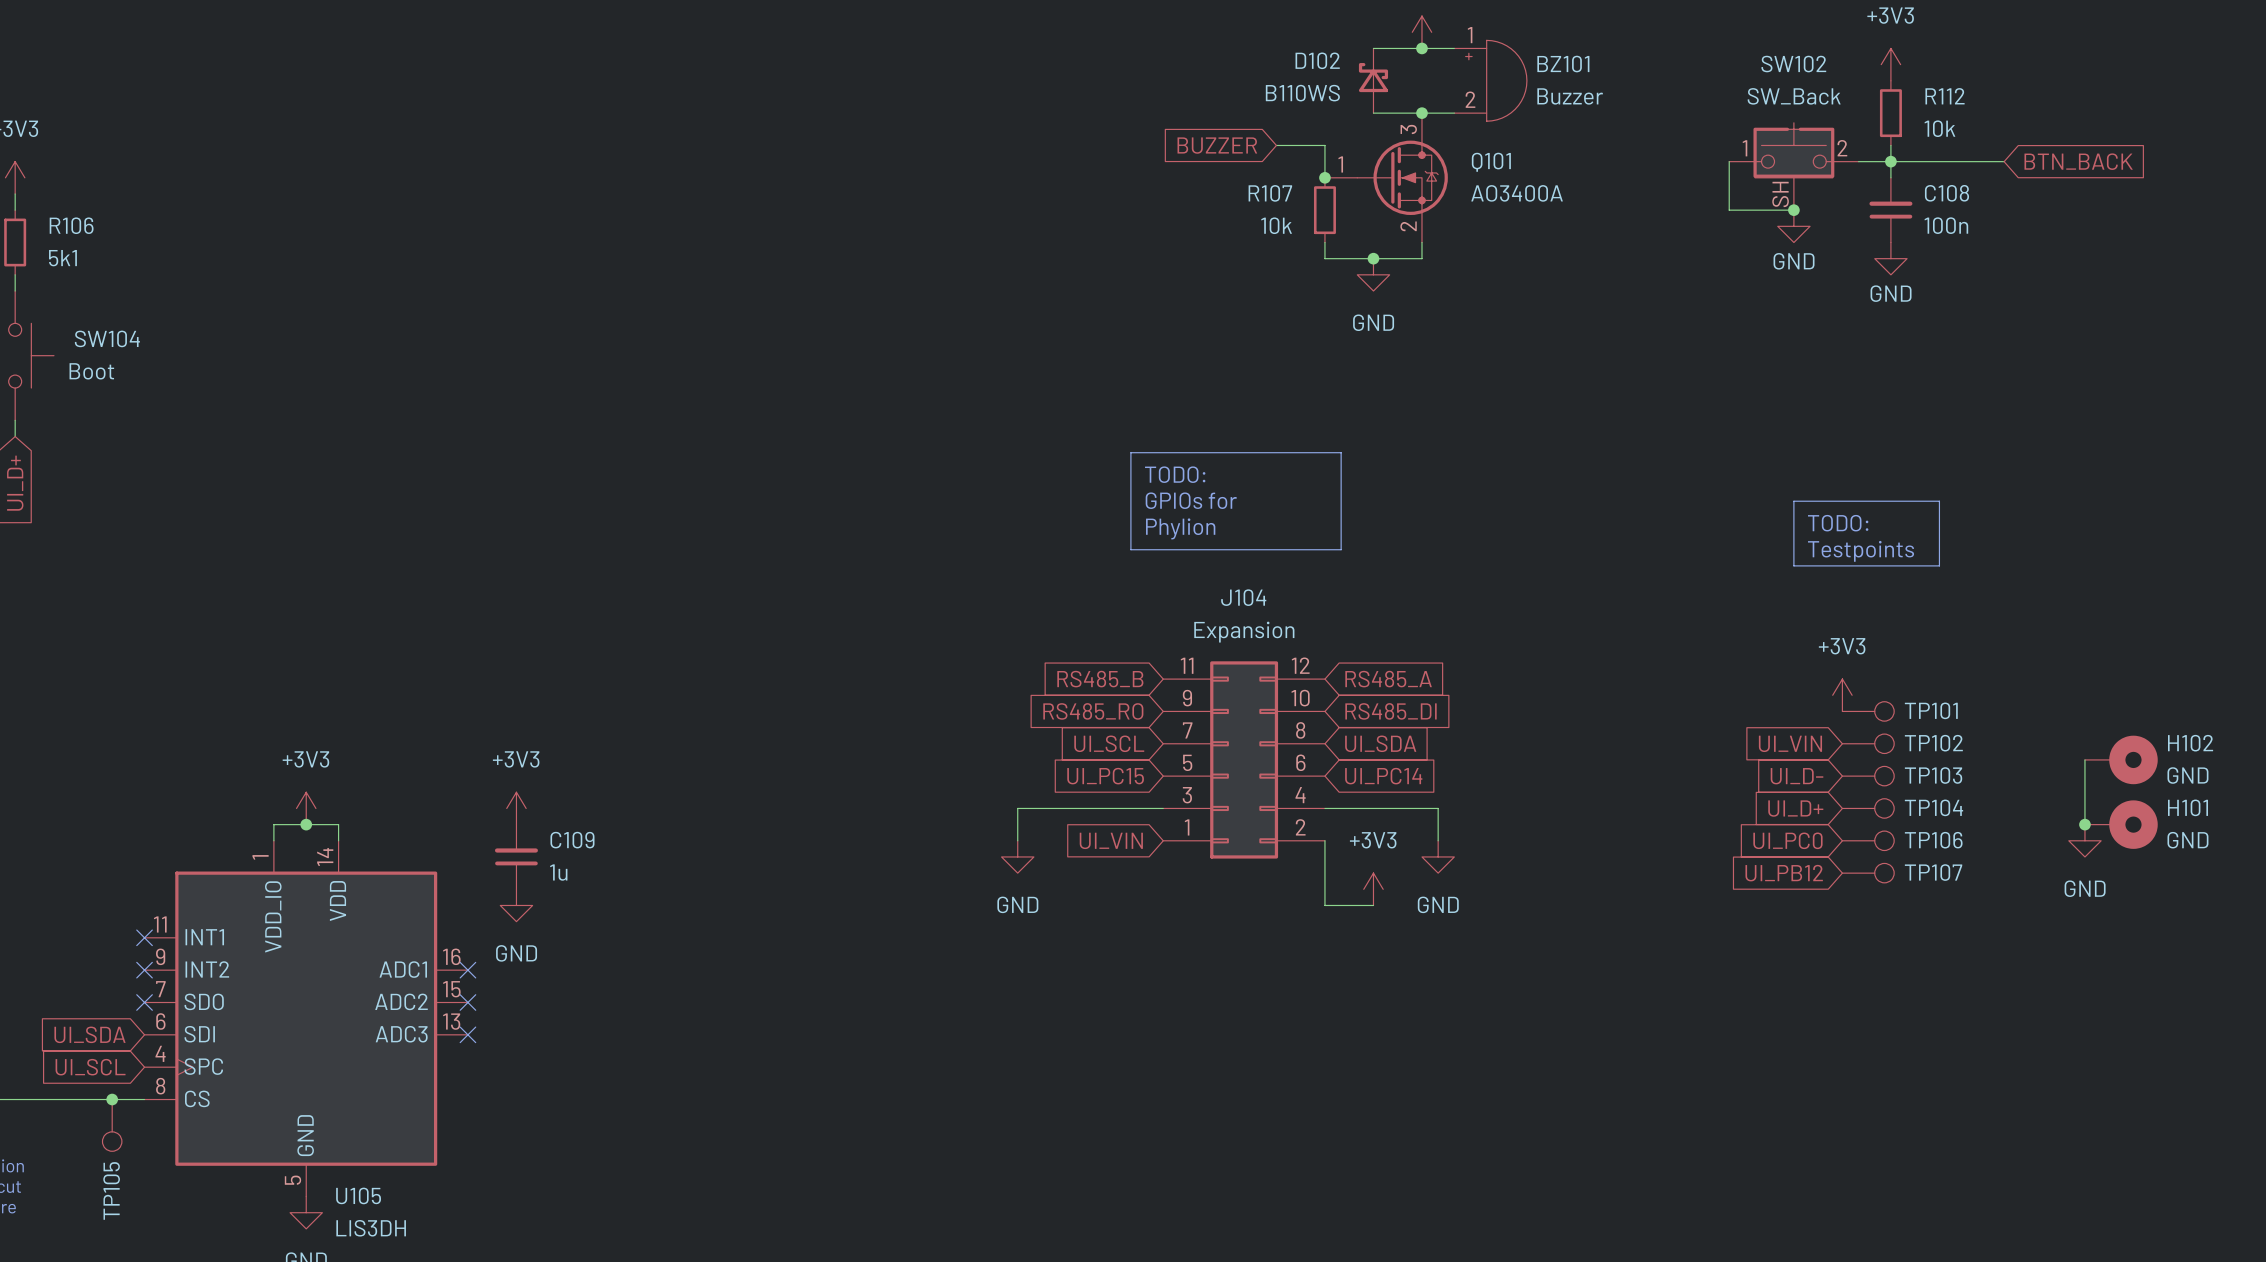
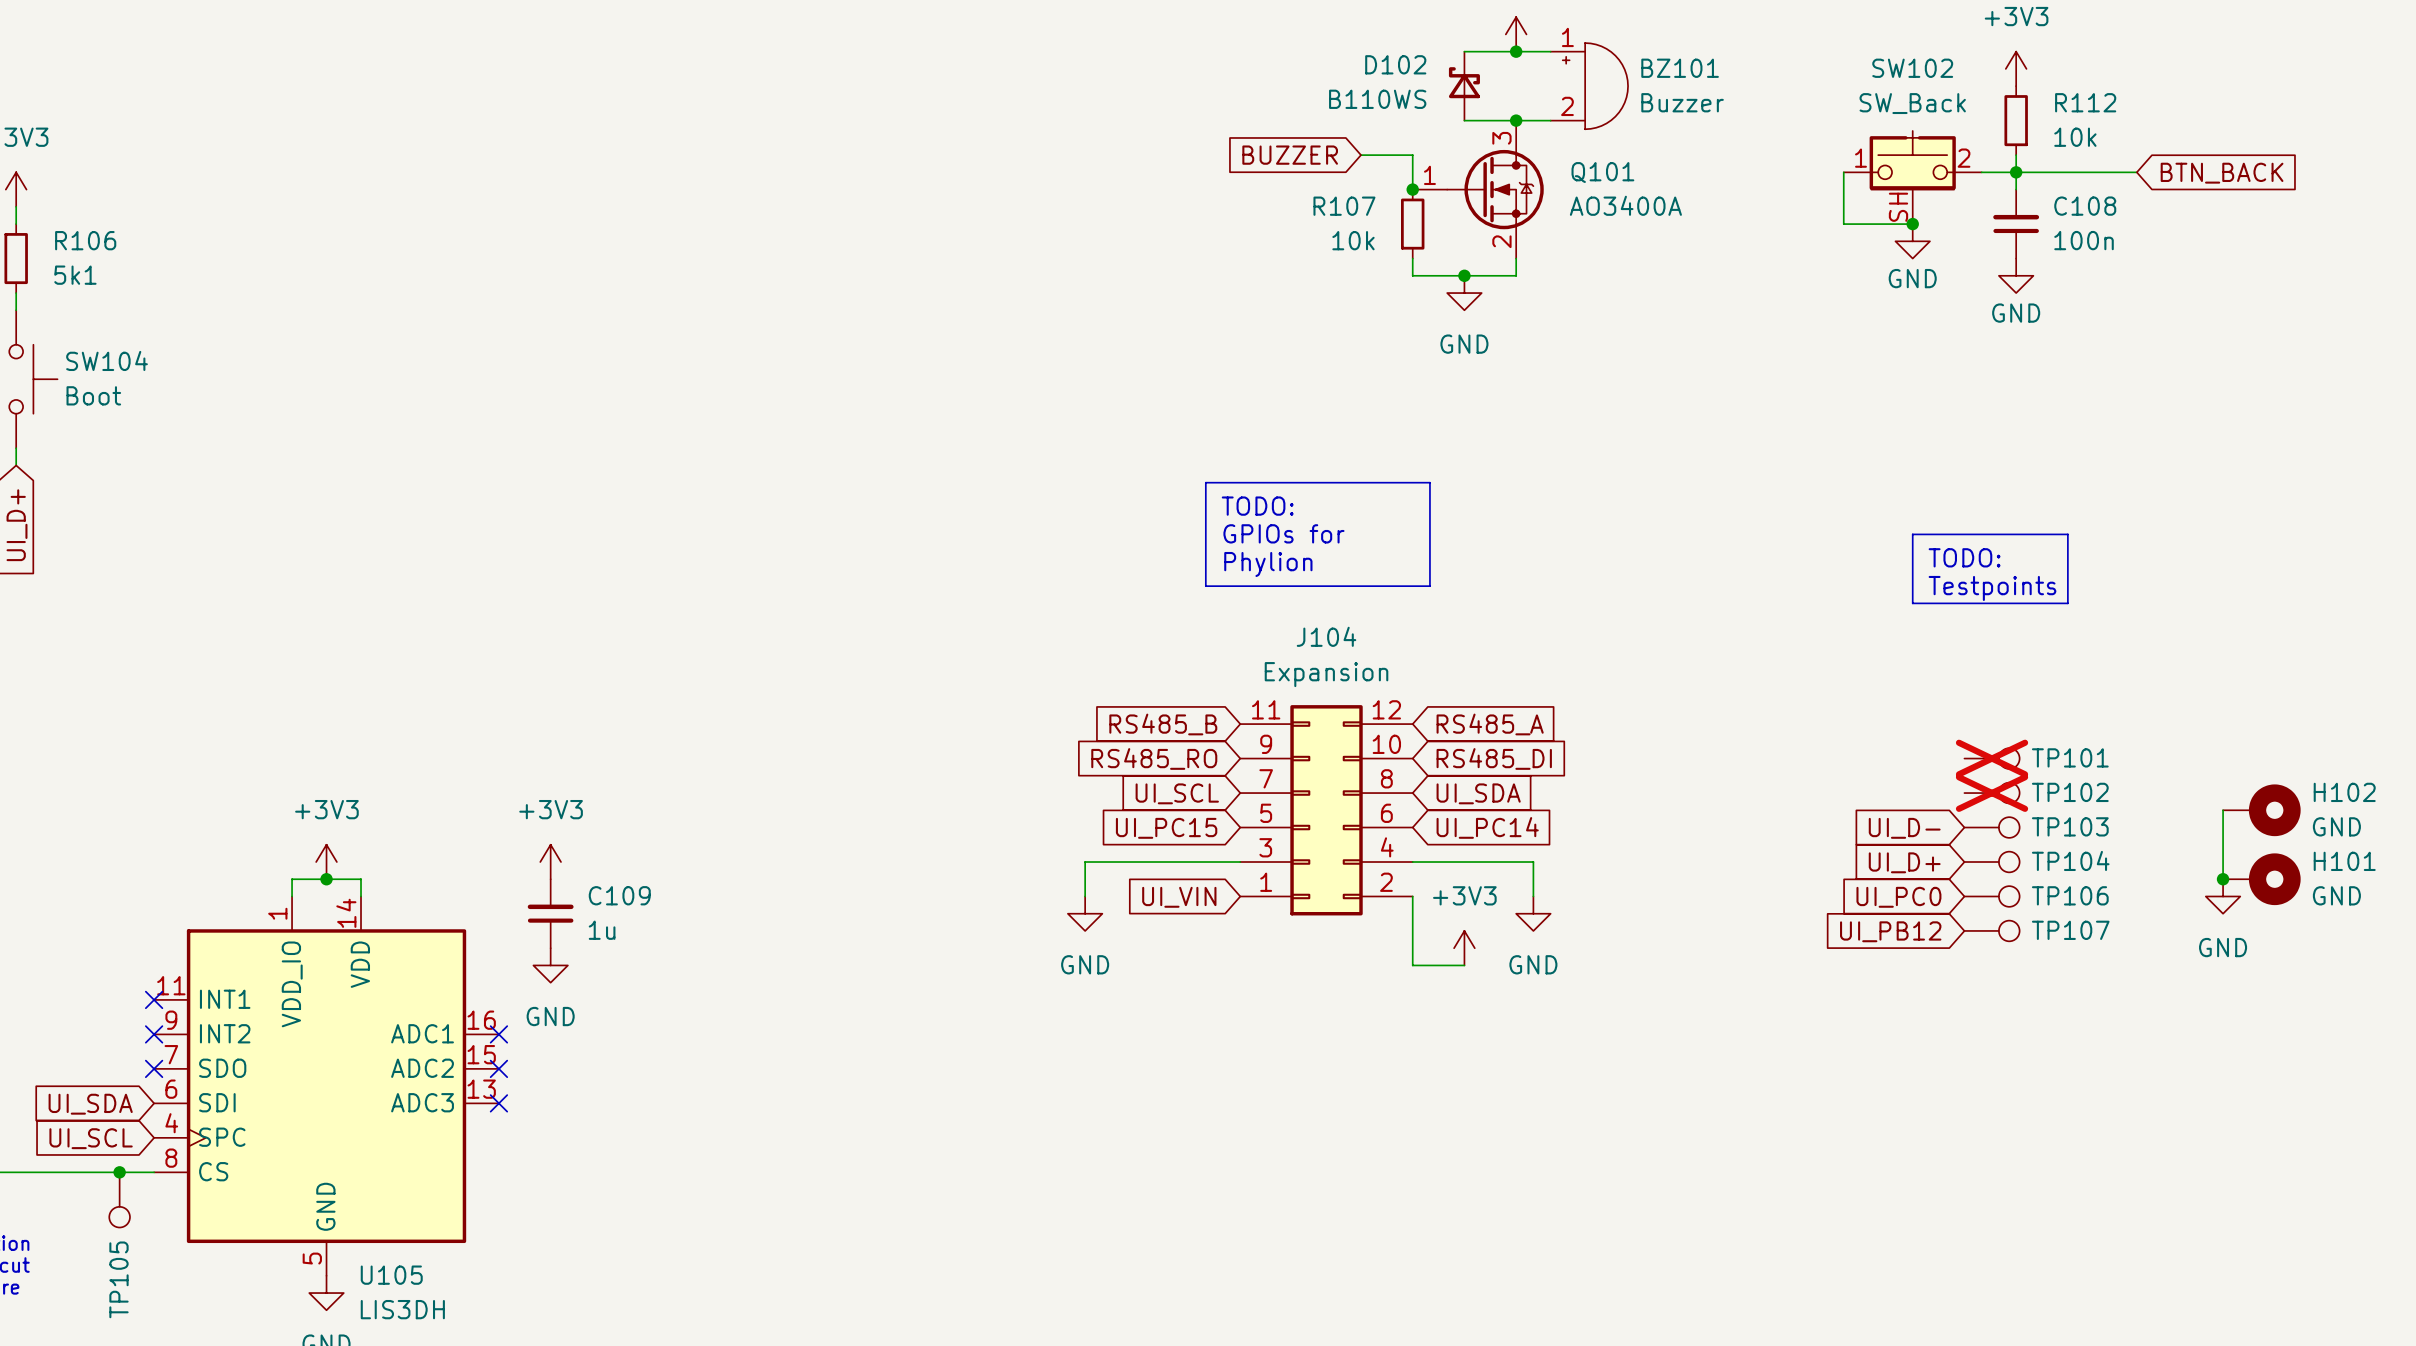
power symbol: +3V3 (1842, 695) -> none
TP101 do-not-place cross: none -> (1992, 758)
global label: UI_VIN (1790, 743) -> none
TP102 do-not-place cross: none -> (1992, 793)

